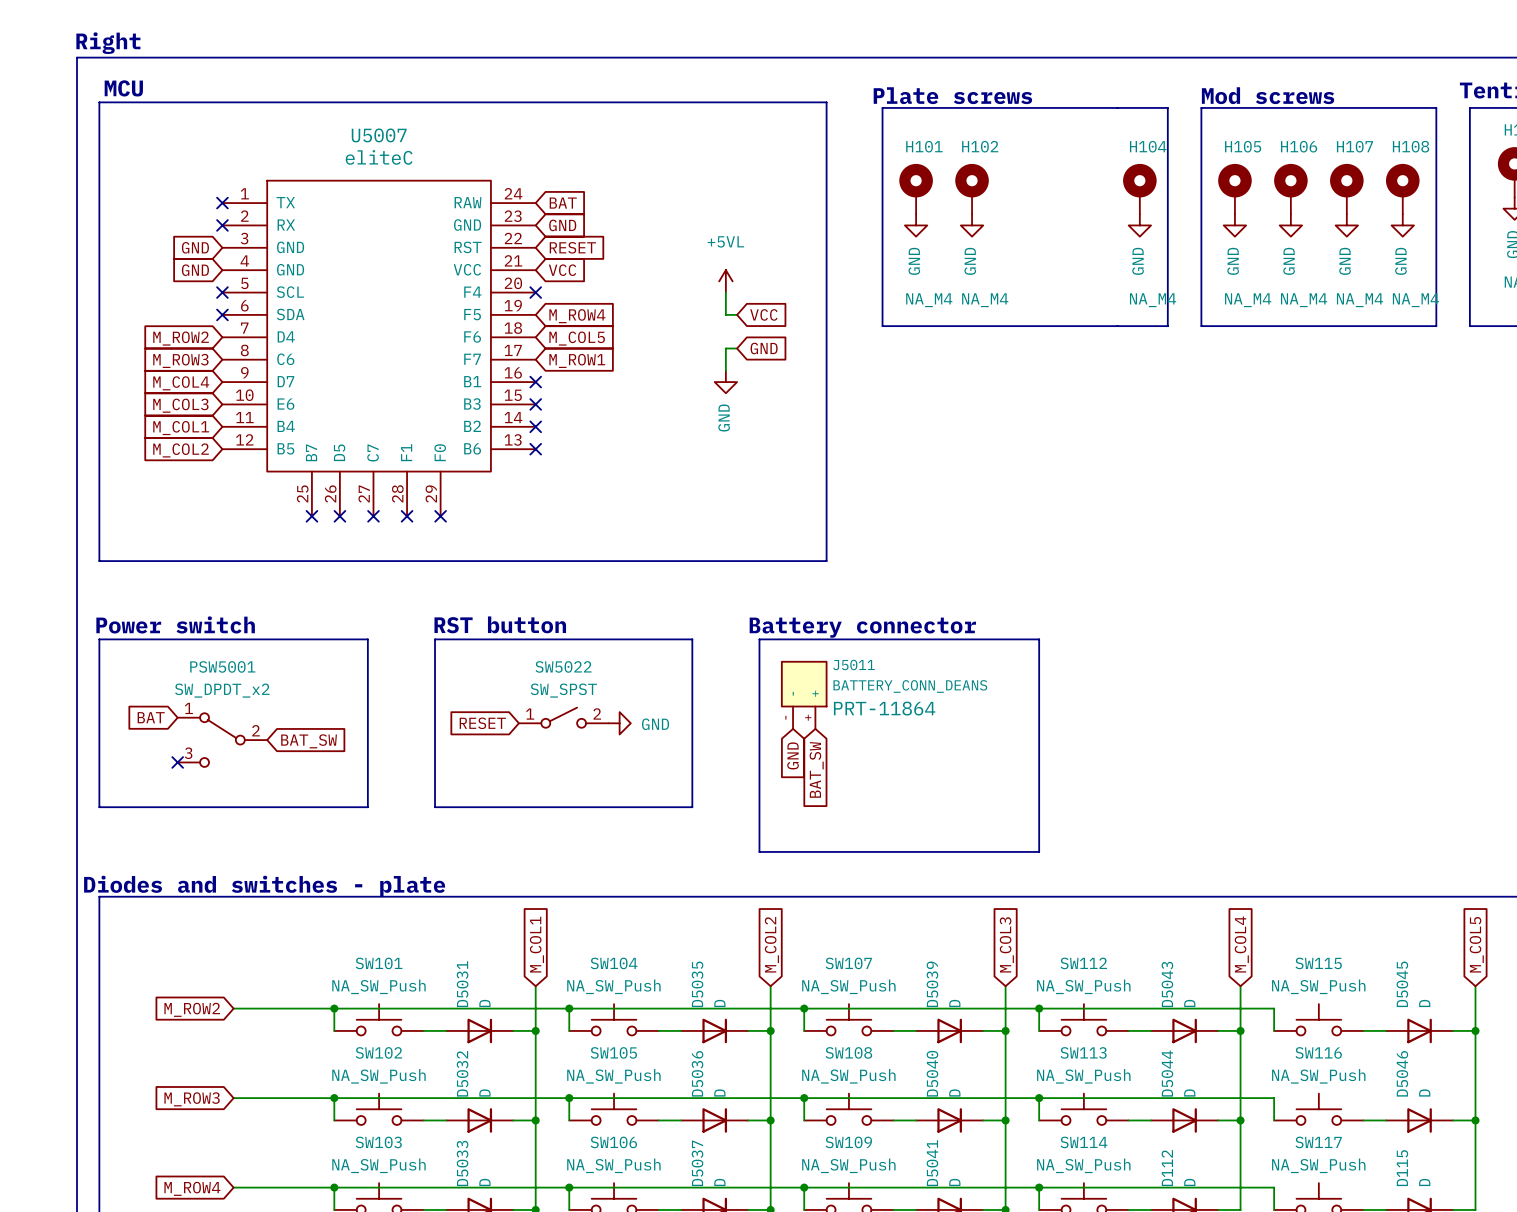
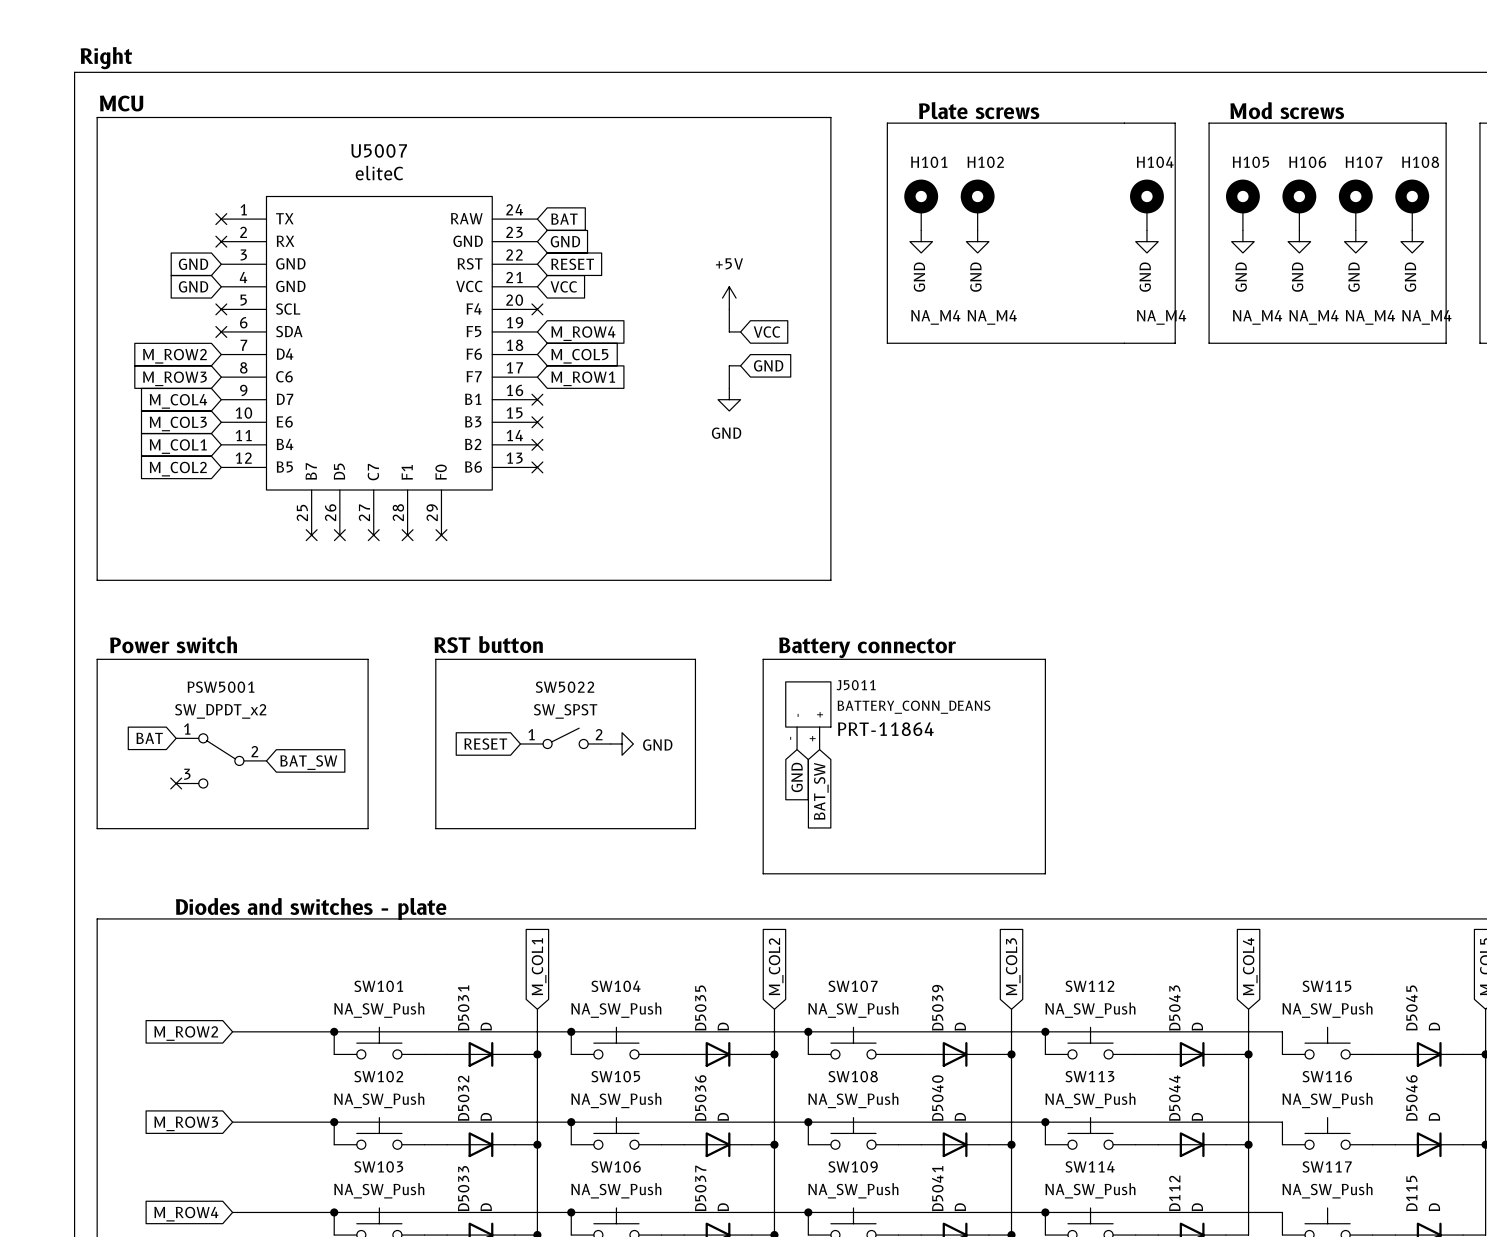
power symbol: +5VL (725, 281) -> +5V (729, 298)
power symbol text rotation: 0° (724, 417) -> 90° clockwise (726, 433)

